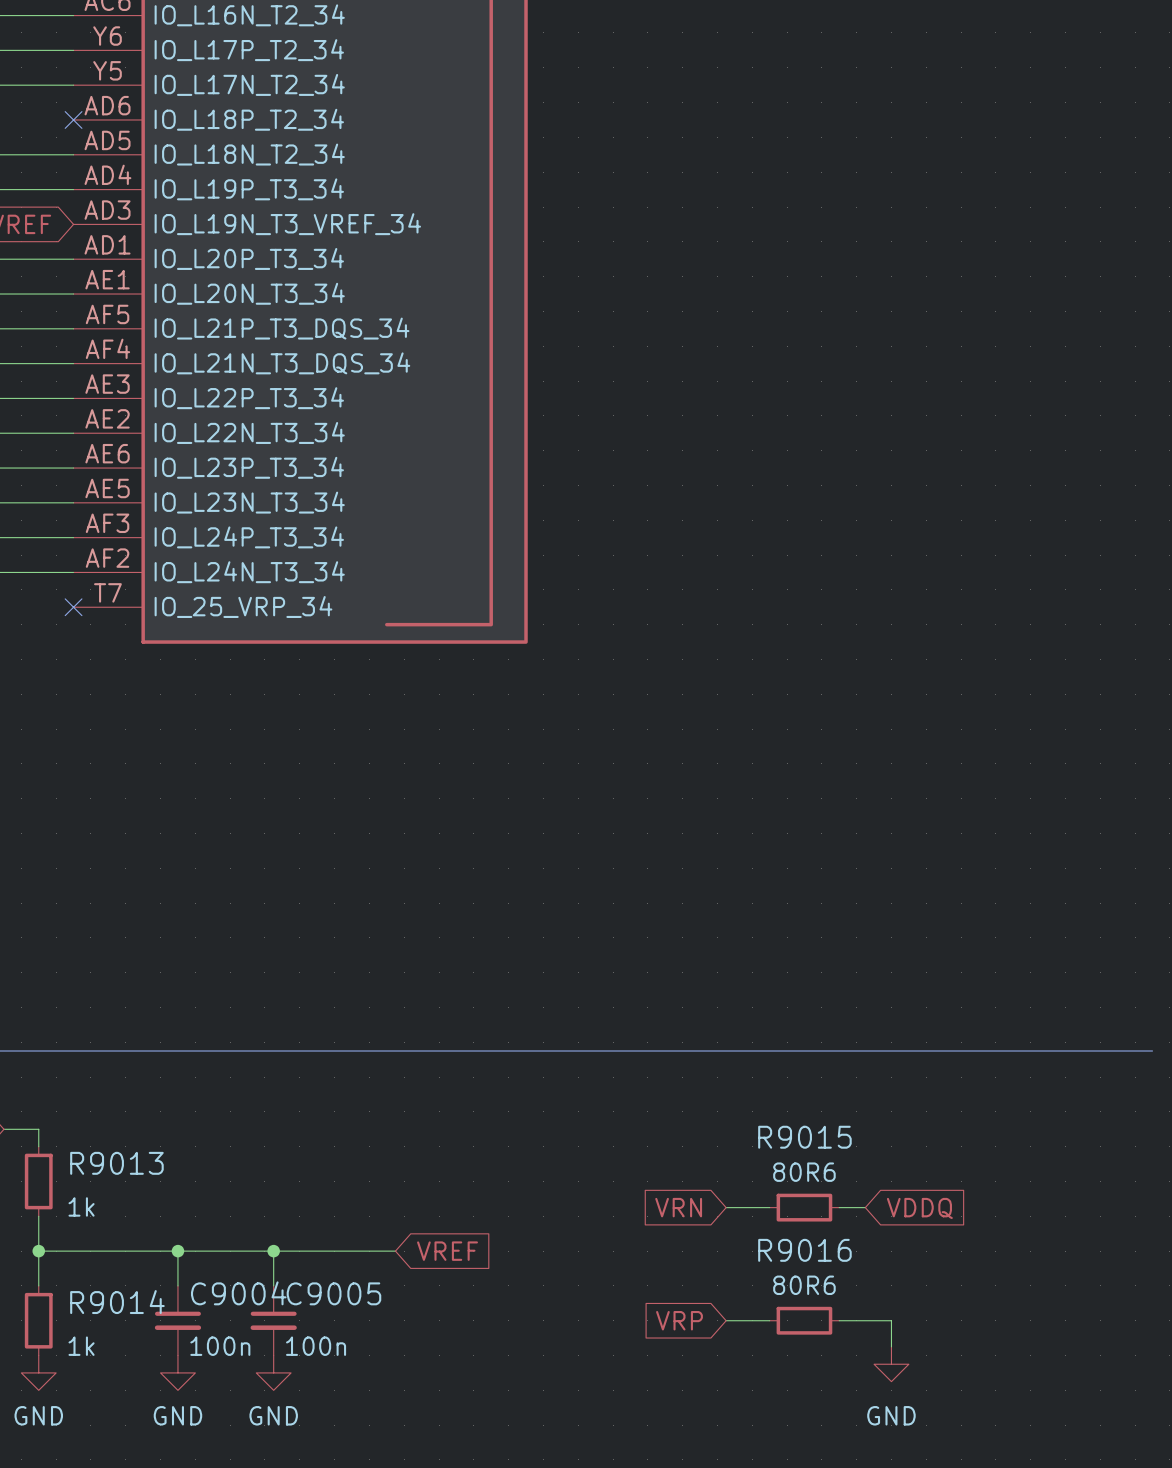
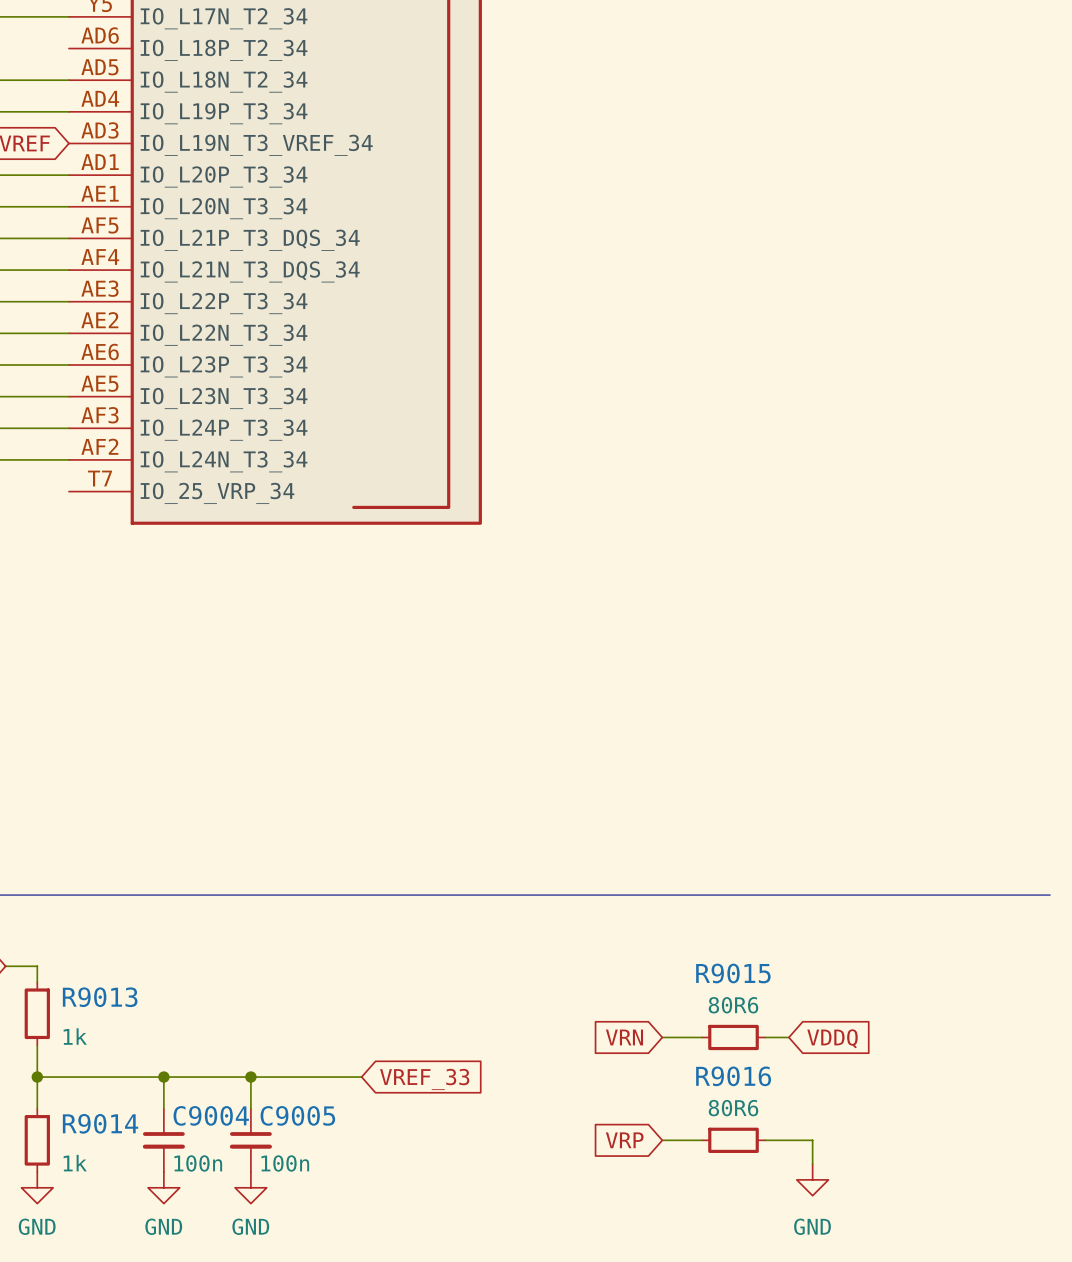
no-connect mark: (73, 119) -> none
no-connect mark: (73, 607) -> none
global label: VREF (447, 1251) -> VREF_33 (424, 1079)

